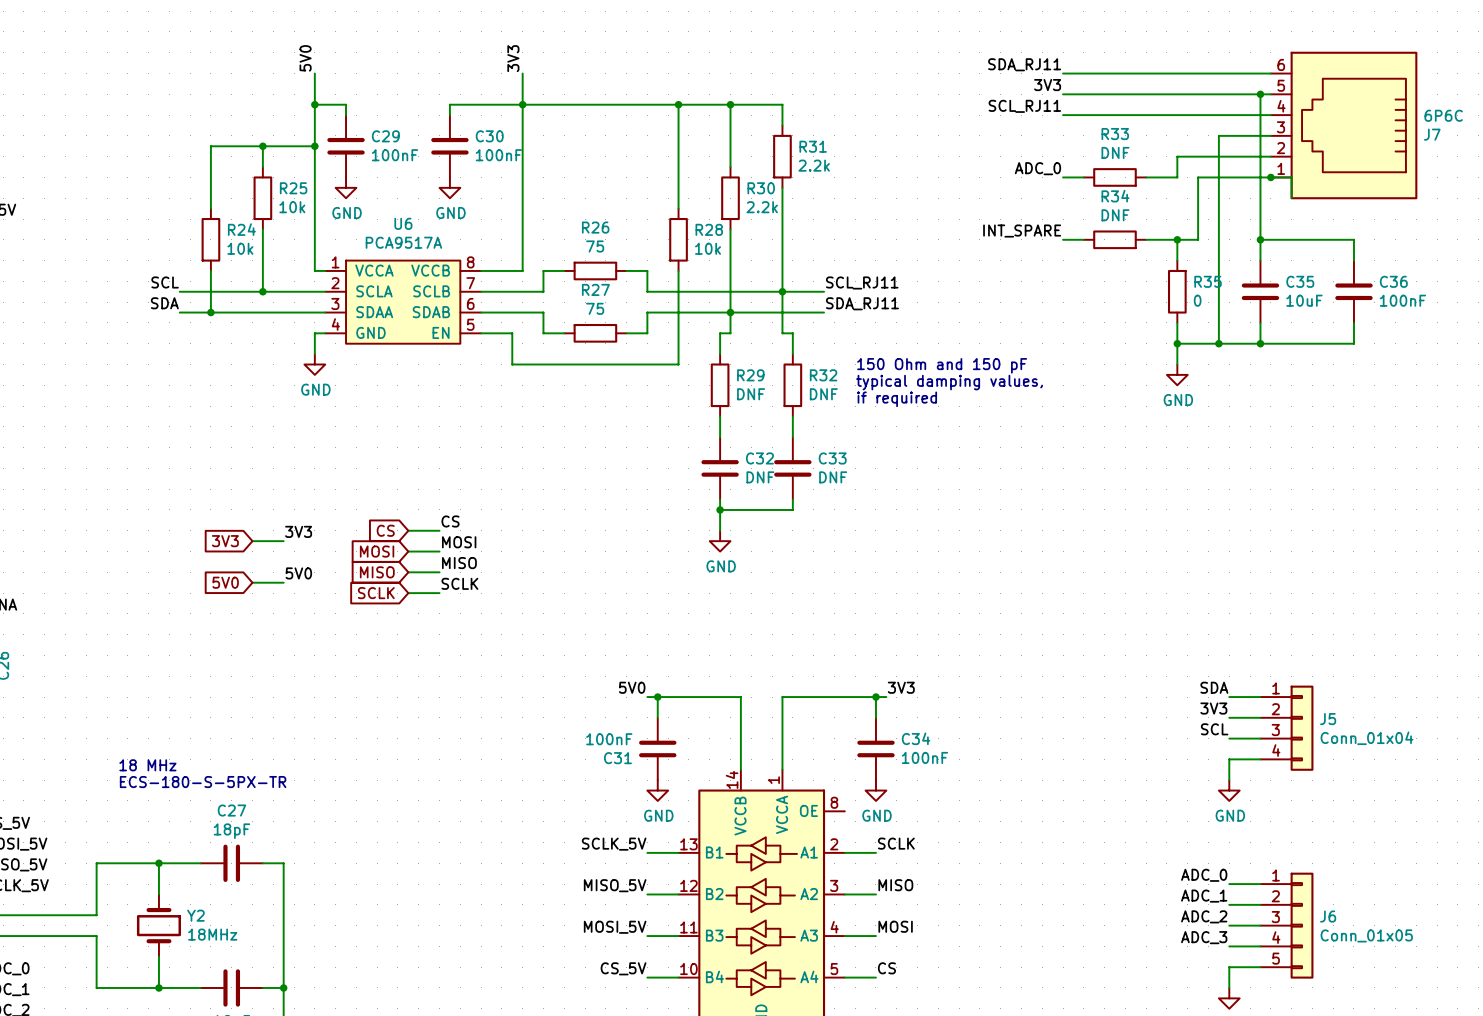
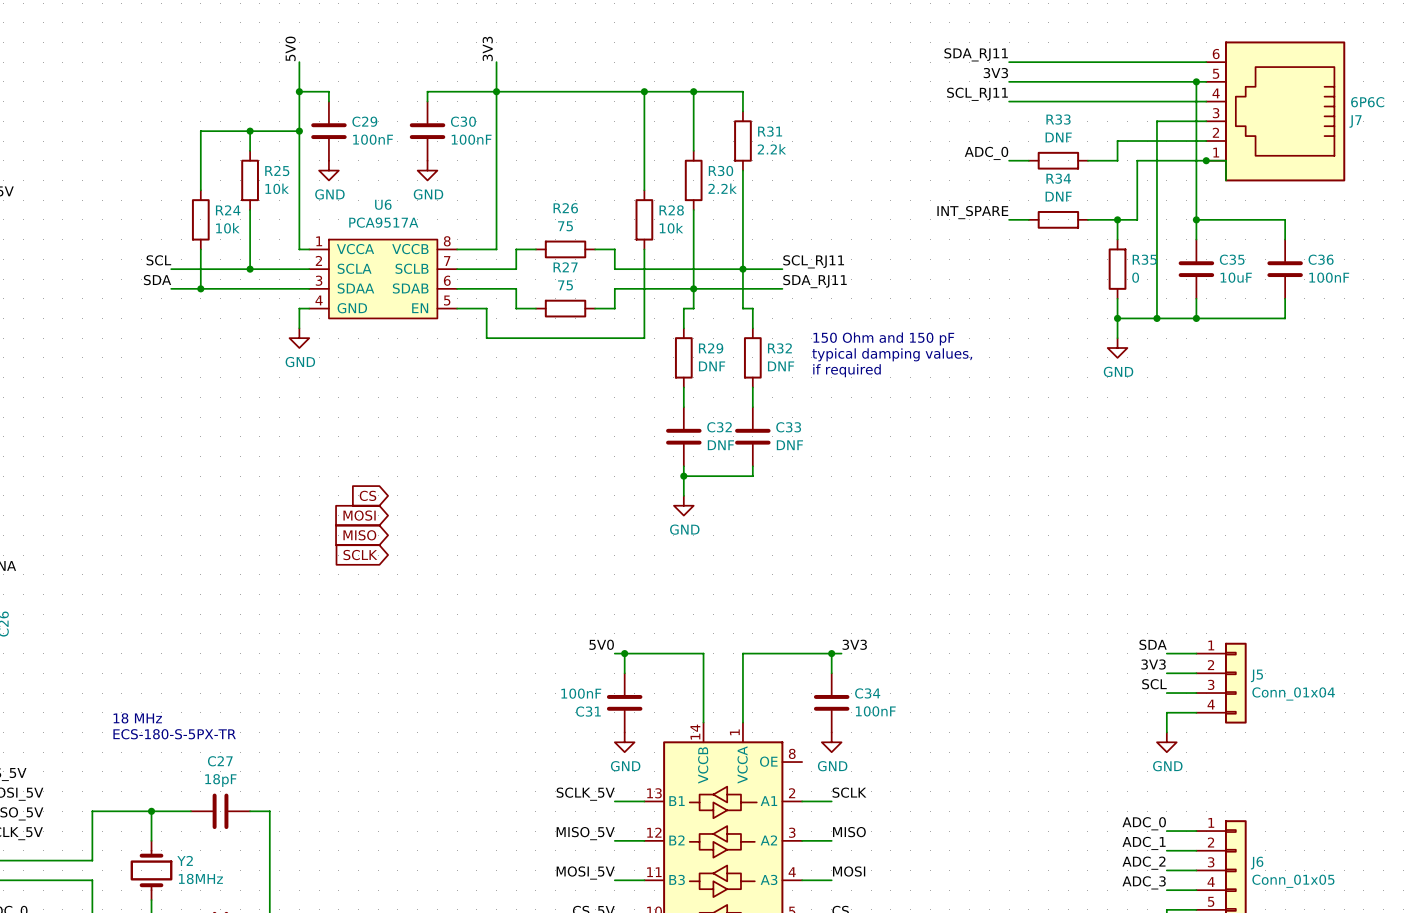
label: CS (450, 521) -> none
wire: (408, 530) (439, 530) -> none
label: 3V3 (298, 531) -> none
global label: 3V3 (225, 541) -> none
wire: (252, 541) (283, 541) -> none
label: MOSI (459, 542) -> none
wire: (408, 551) (439, 551) -> none
label: MISO (459, 563) -> none
wire: (408, 572) (439, 572) -> none
label: 5V0 (298, 573) -> none
global label: 5V0 (225, 582) -> none
wire: (252, 582) (283, 582) -> none
label: SCLK (459, 583) -> none
wire: (408, 593) (439, 593) -> none

